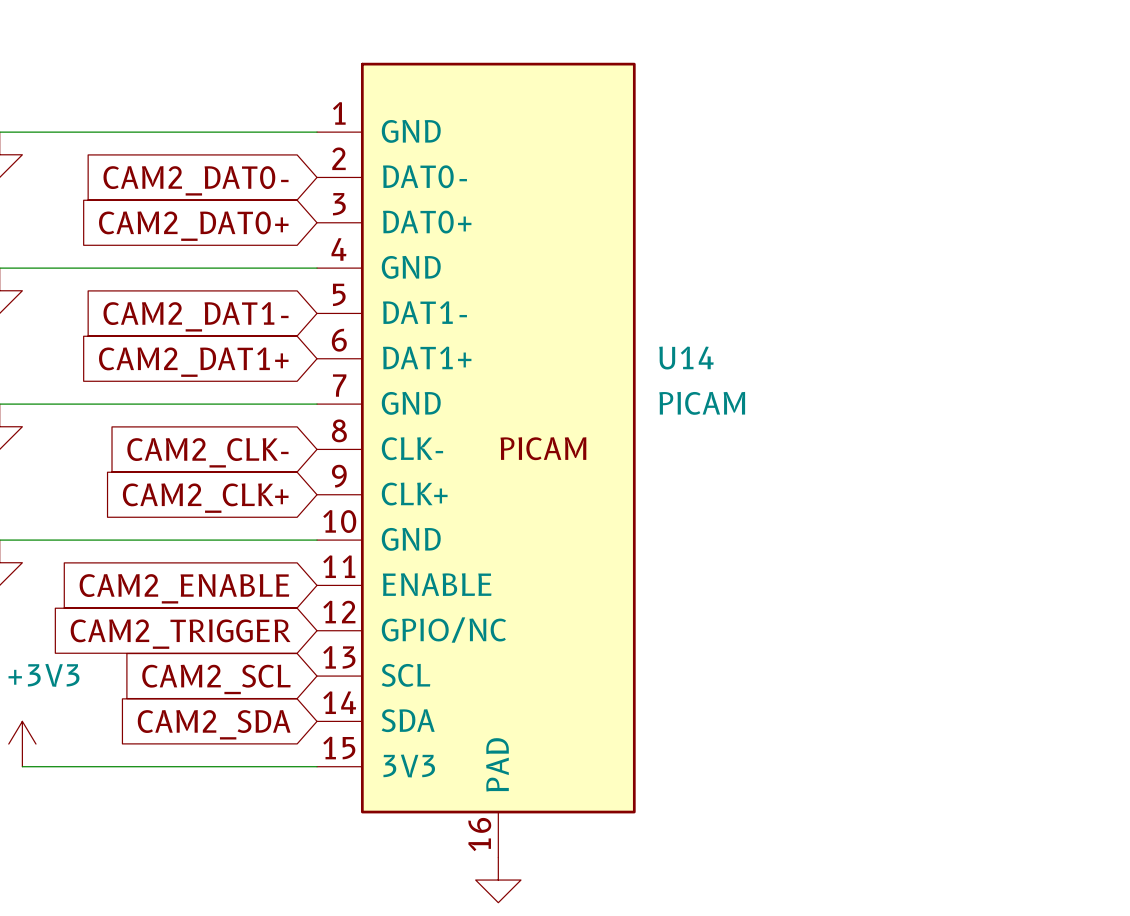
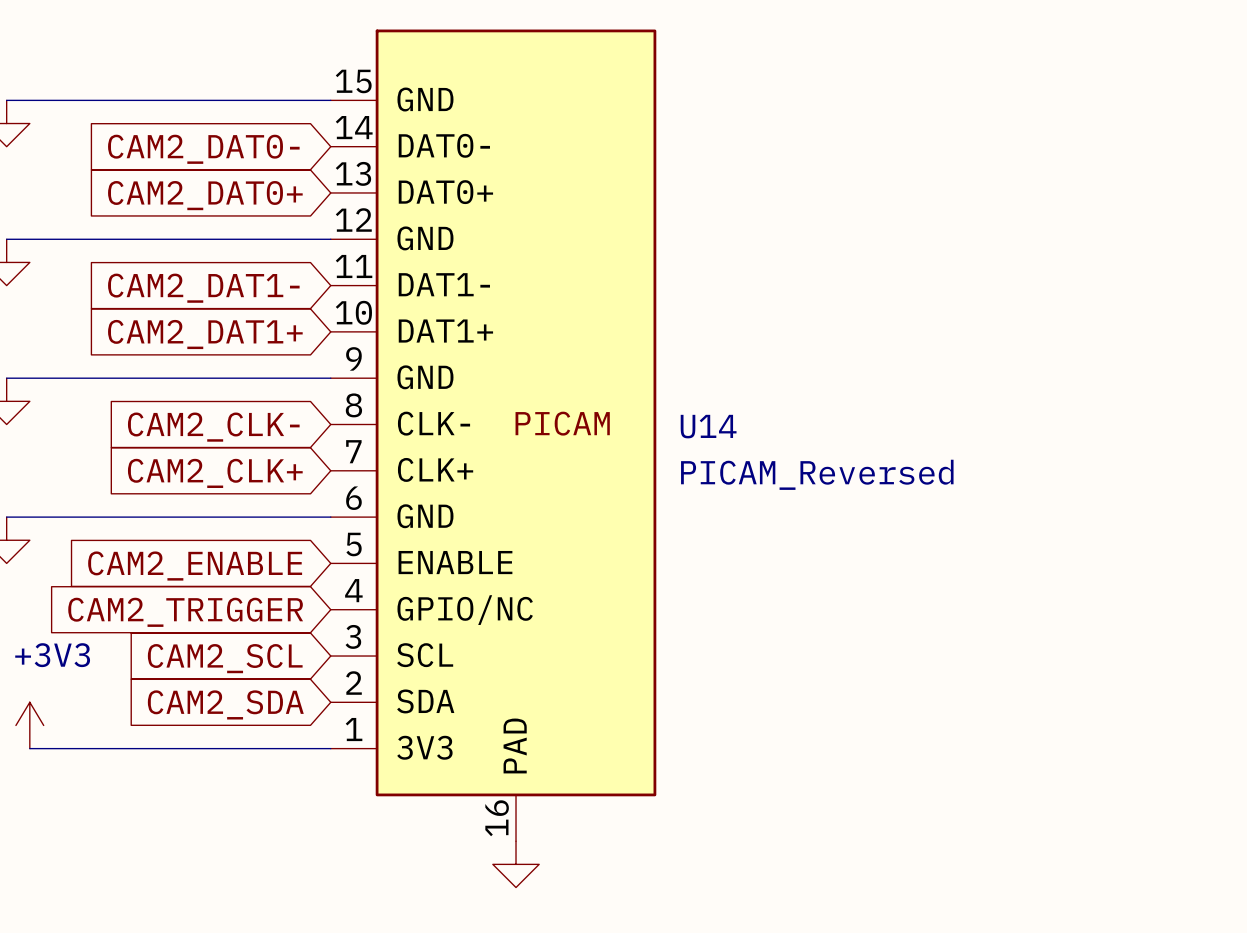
U14 symbol: [317, 62, 636, 858] -> [330, 29, 657, 842]
U14 name position: U14 (686, 358) -> U14 (708, 426)
U14 value: PICAM (702, 403) -> PICAM_Reversed (817, 474)

